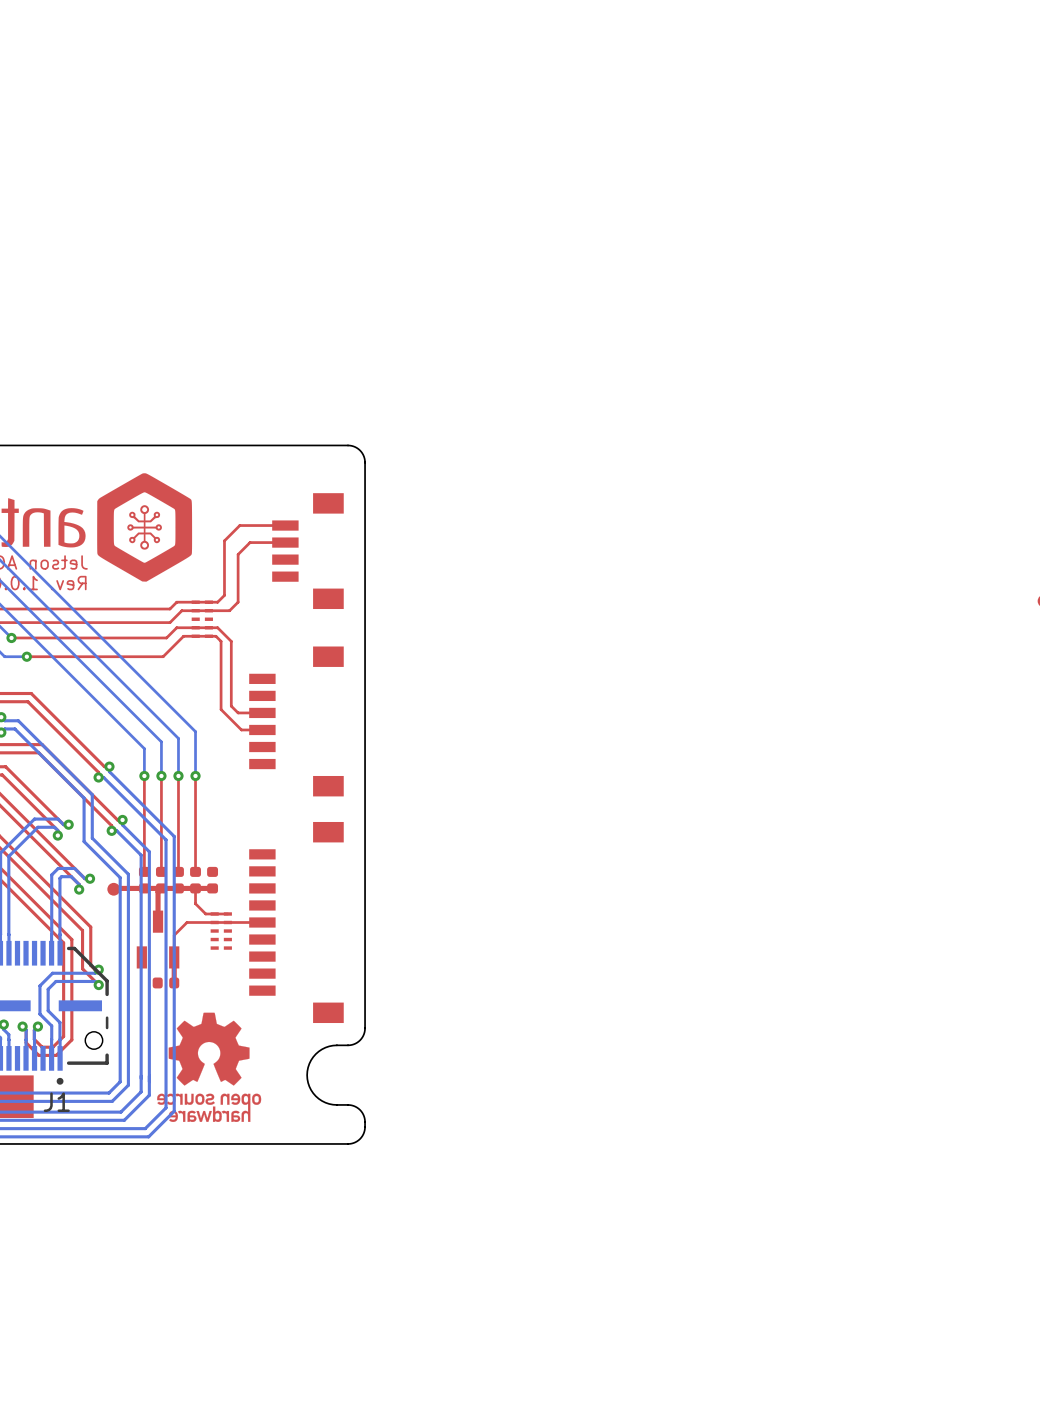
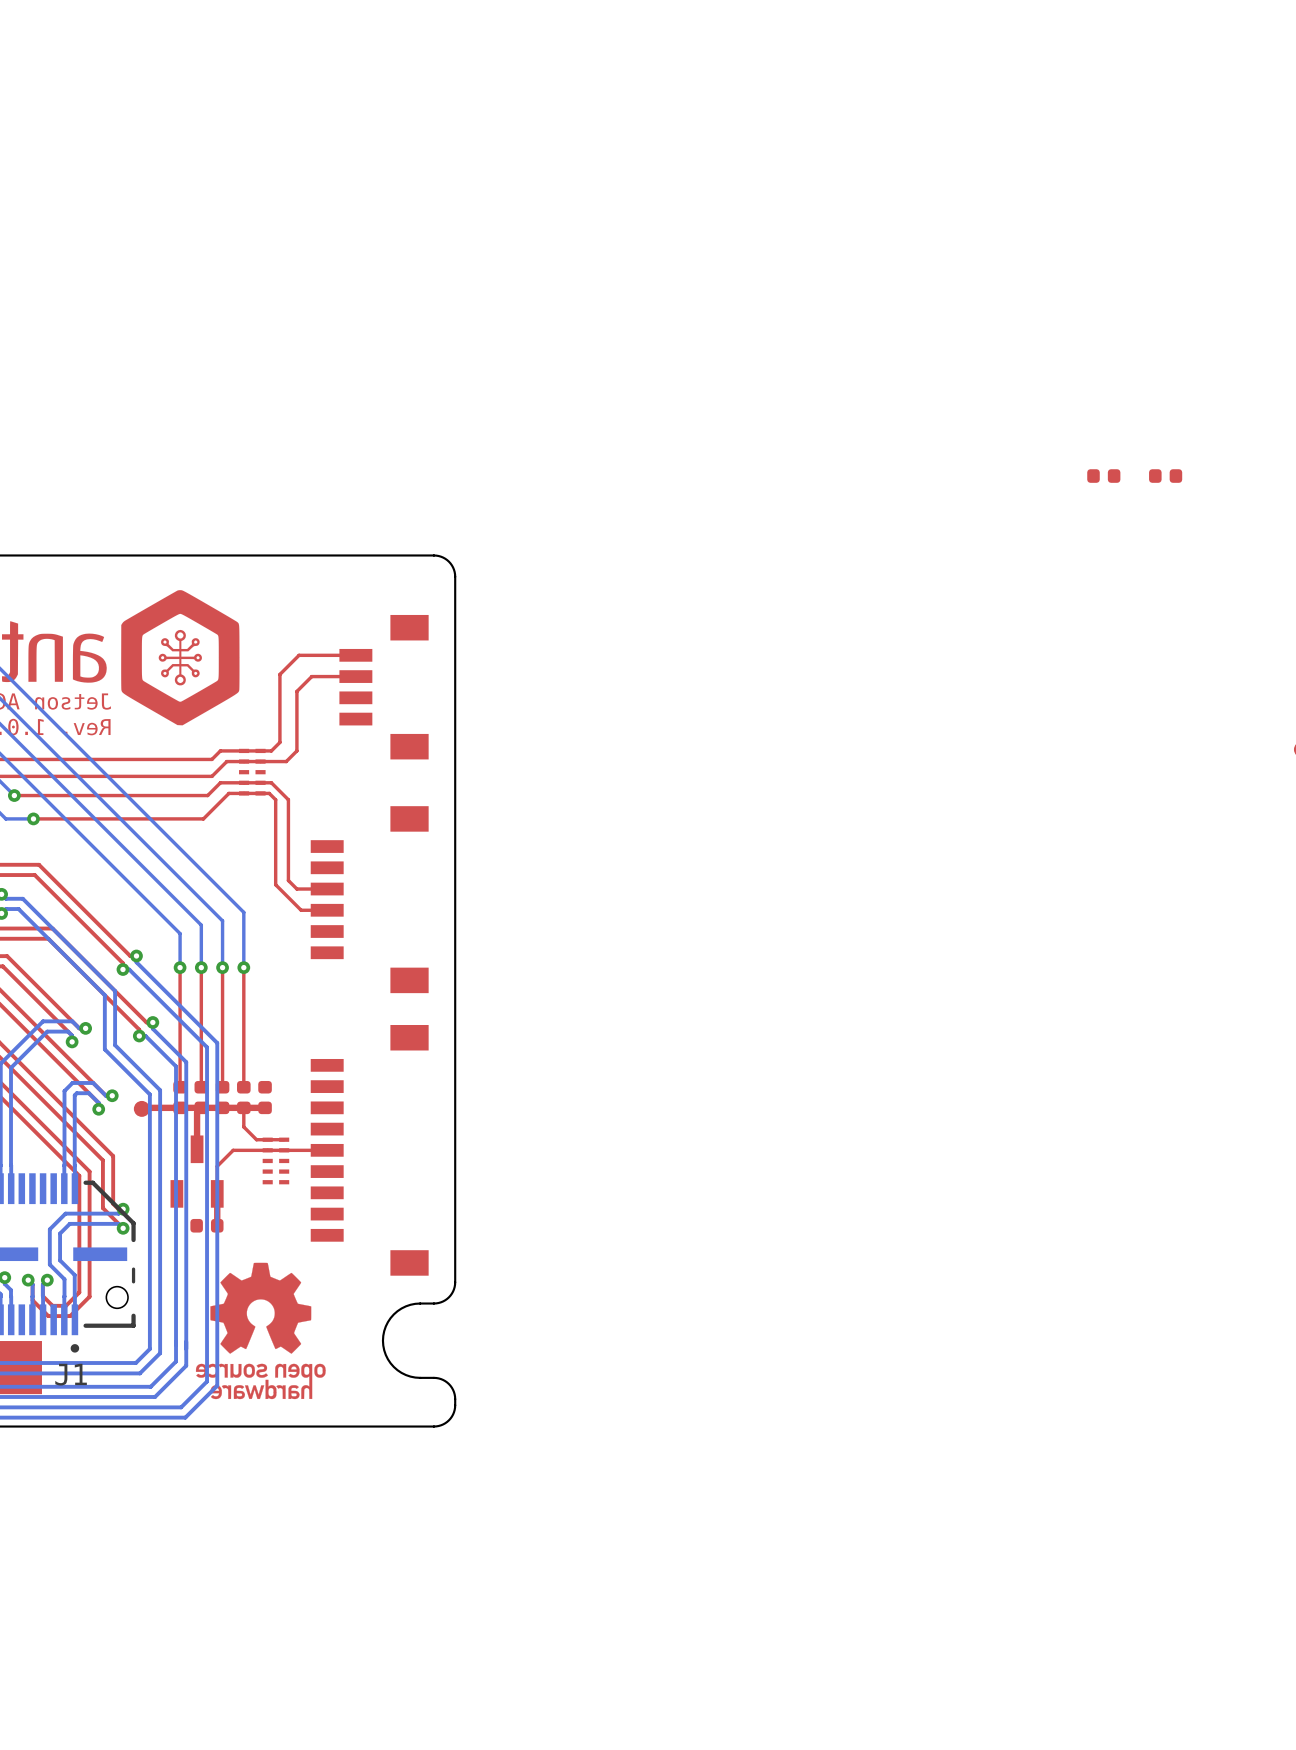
part: none -> (1103, 476)
part: none -> (1165, 476)

